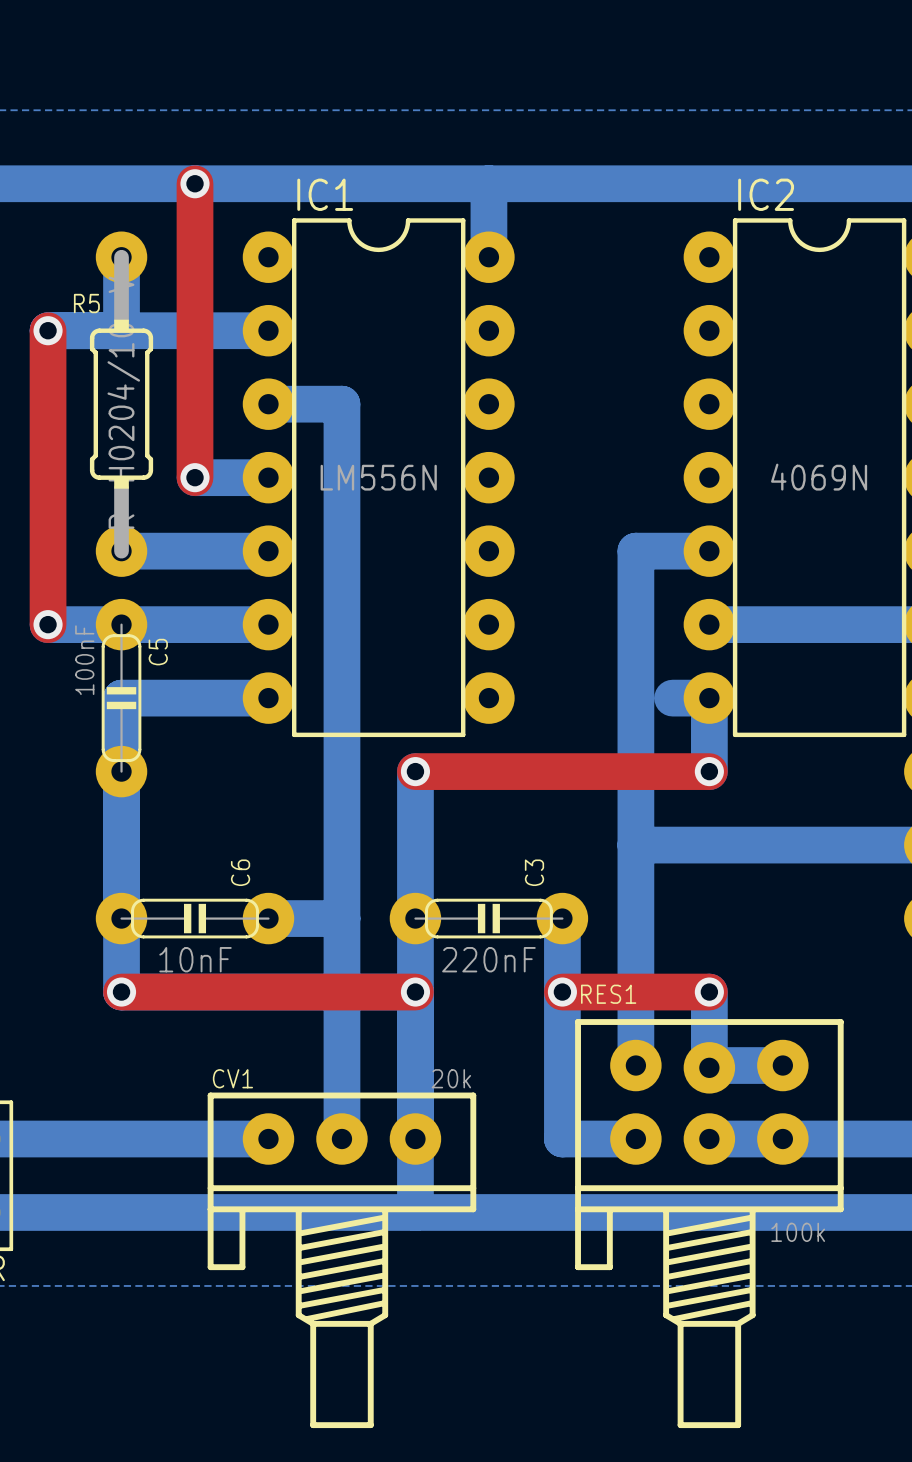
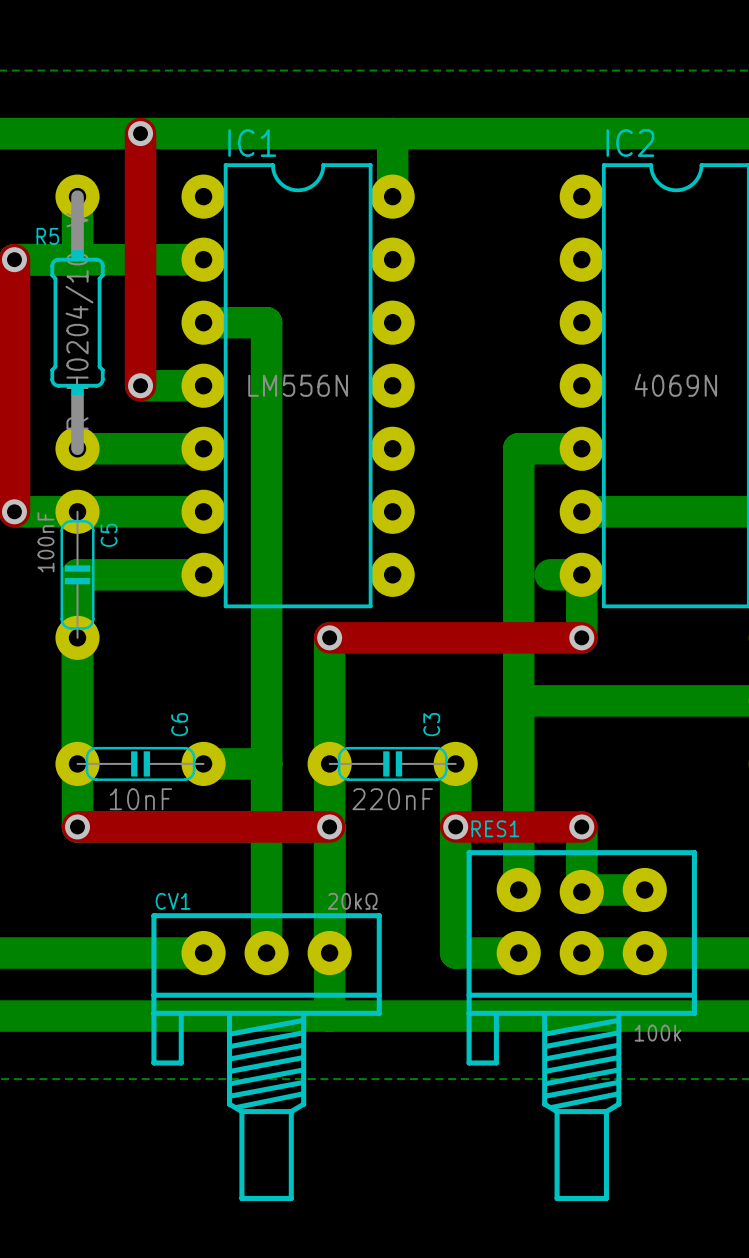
CV1 value: 20k (451, 1078) -> 20kΩ (352, 901)

